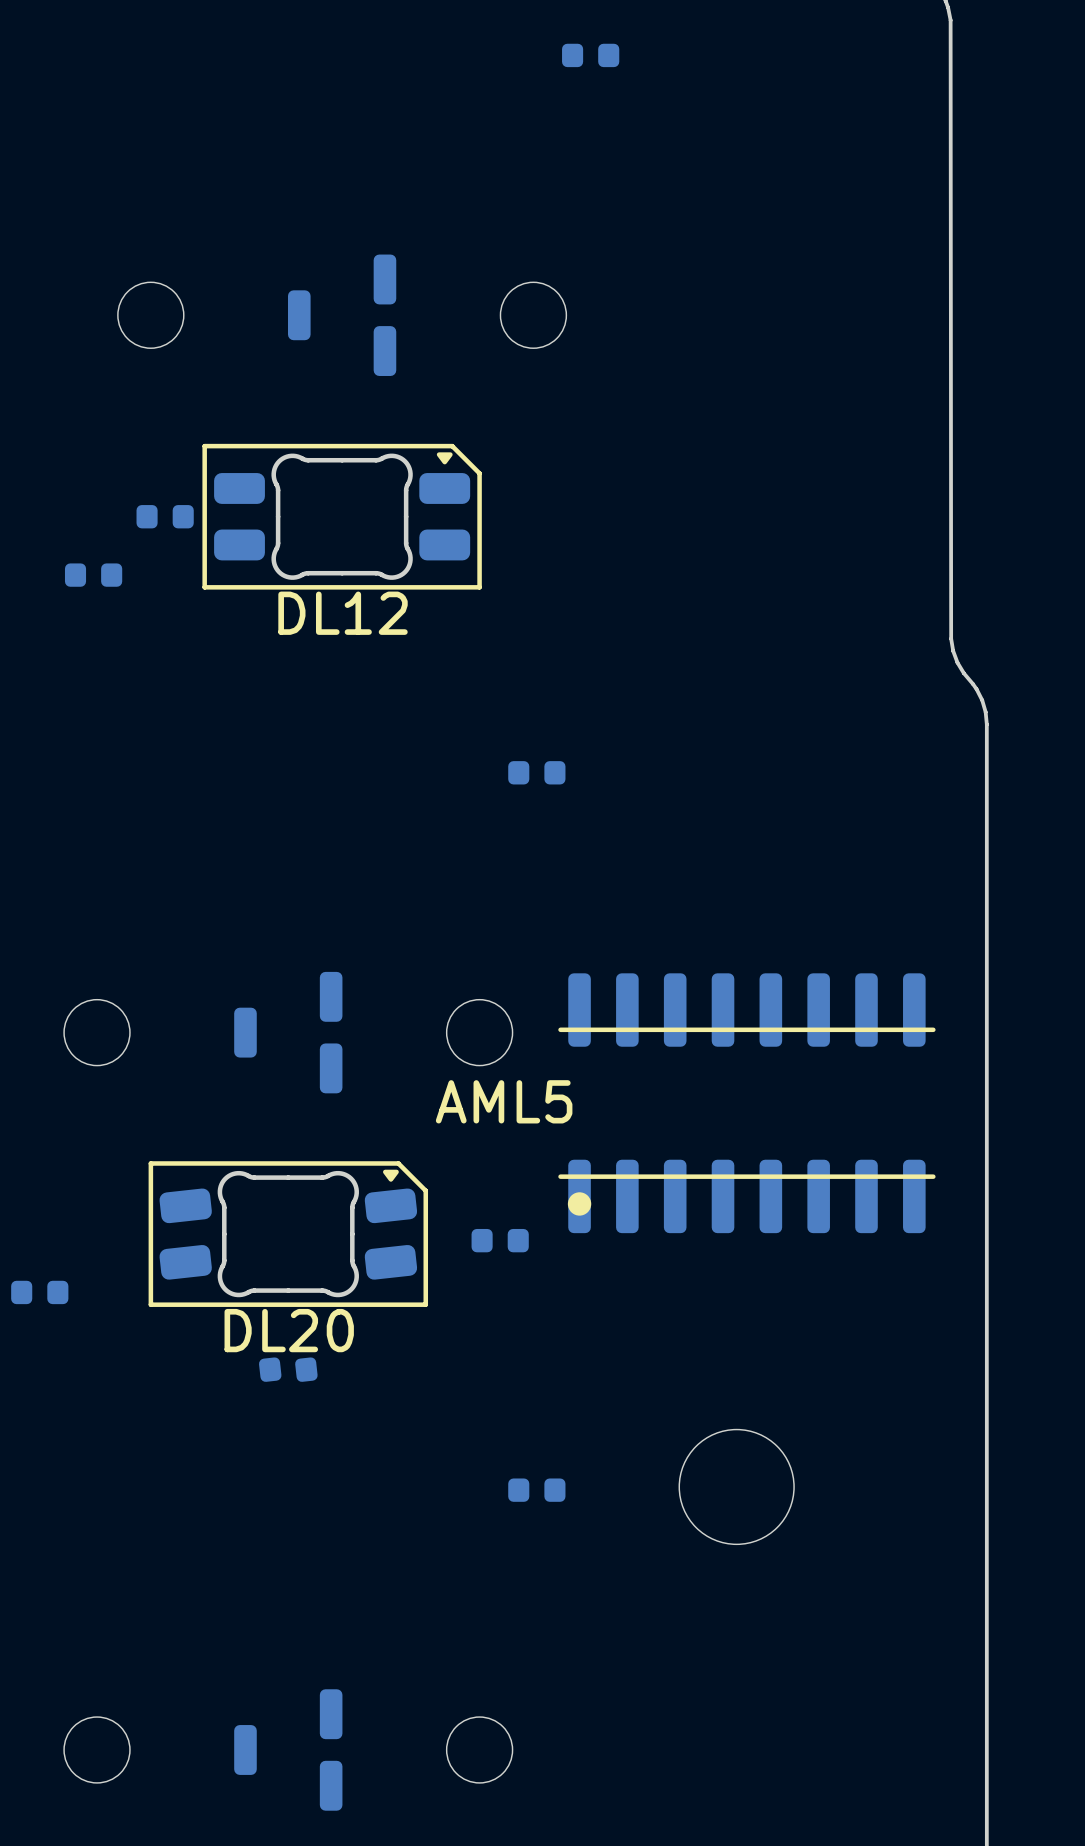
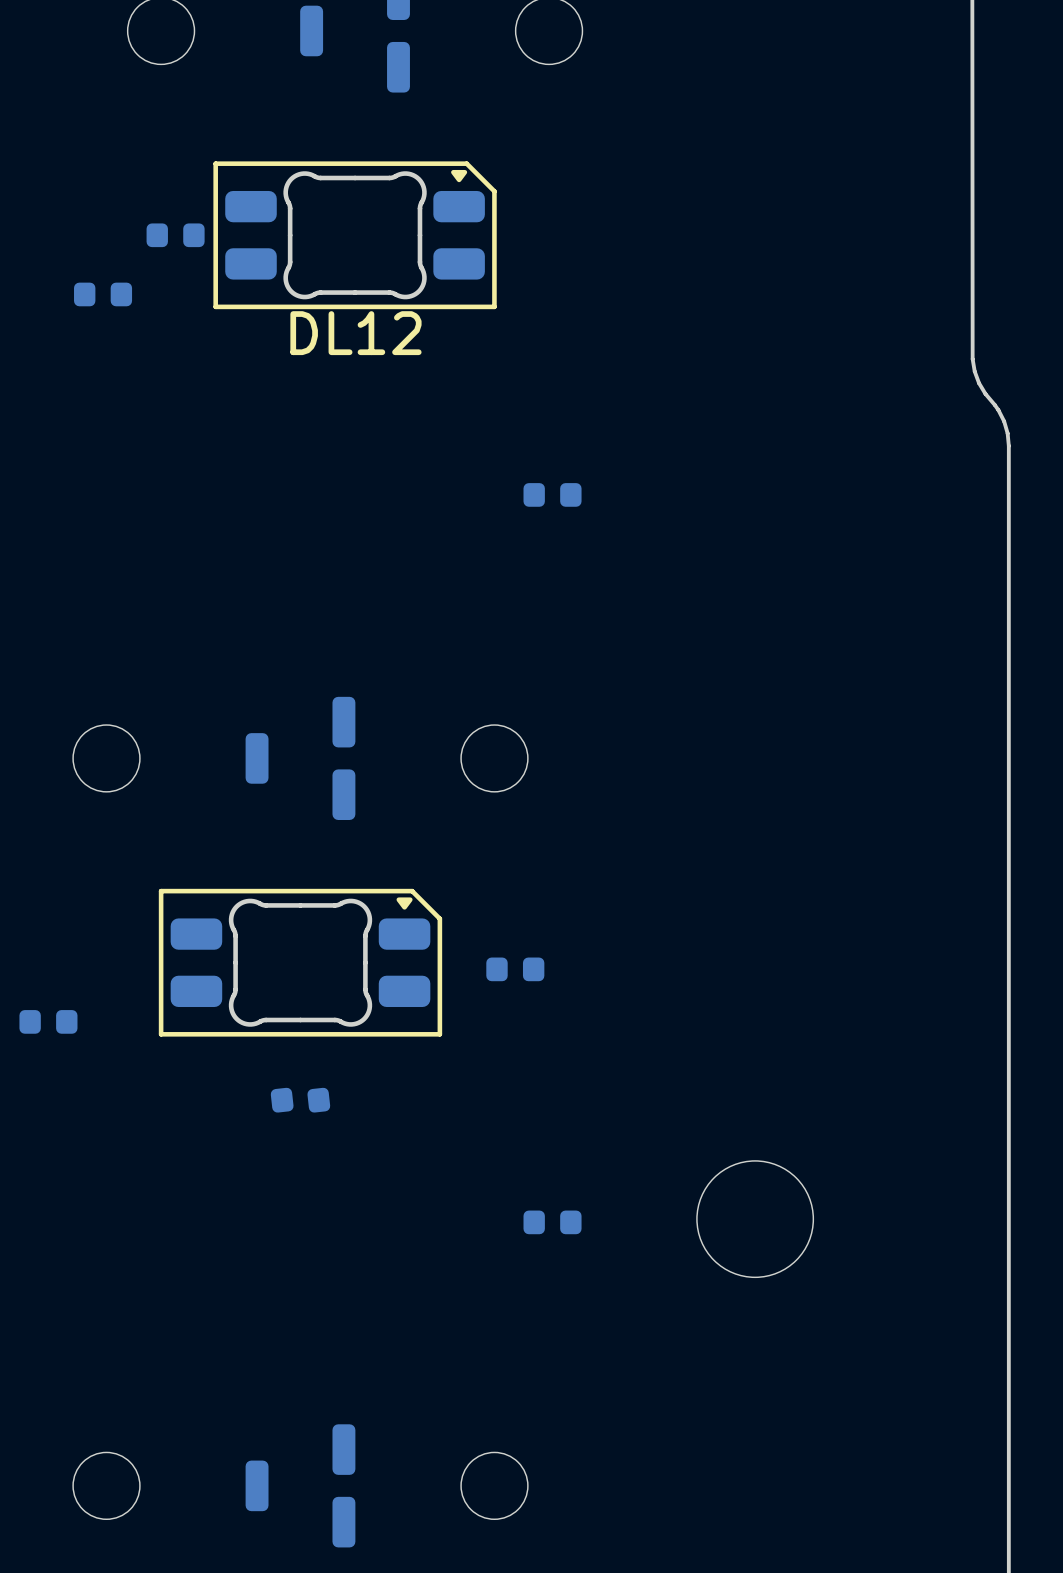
AML5: (746, 1103) -> none
DL20: (288, 1234) -> none
part: none -> (300, 962)

